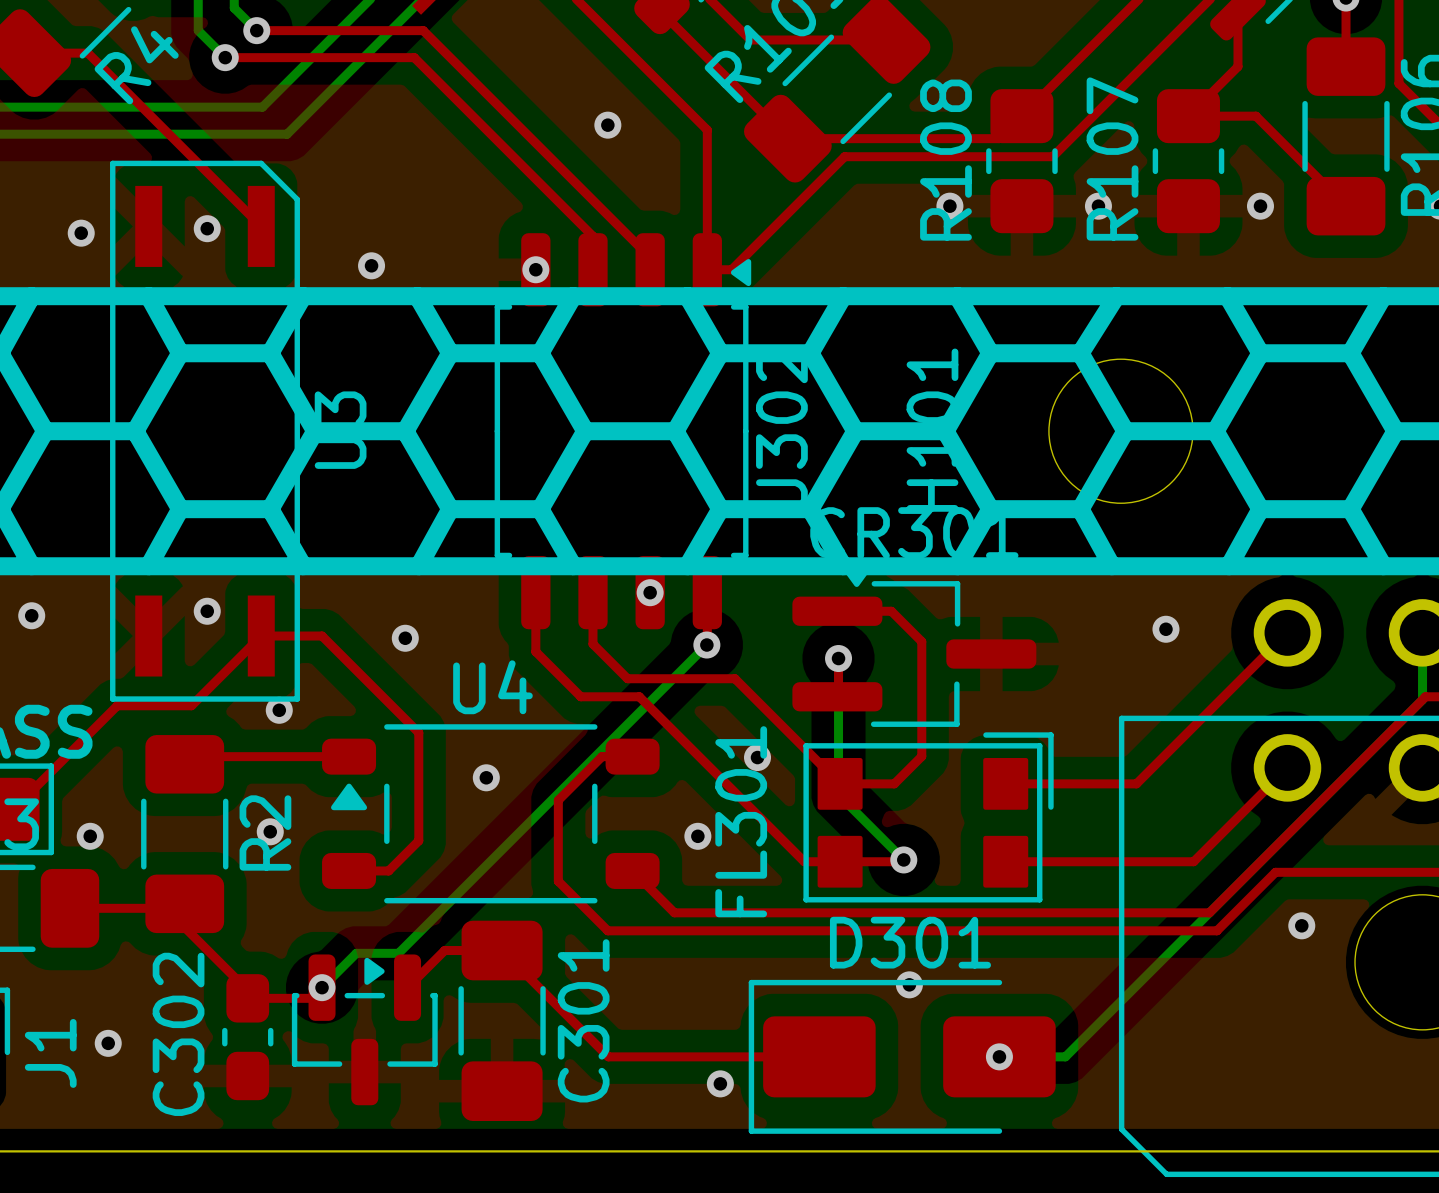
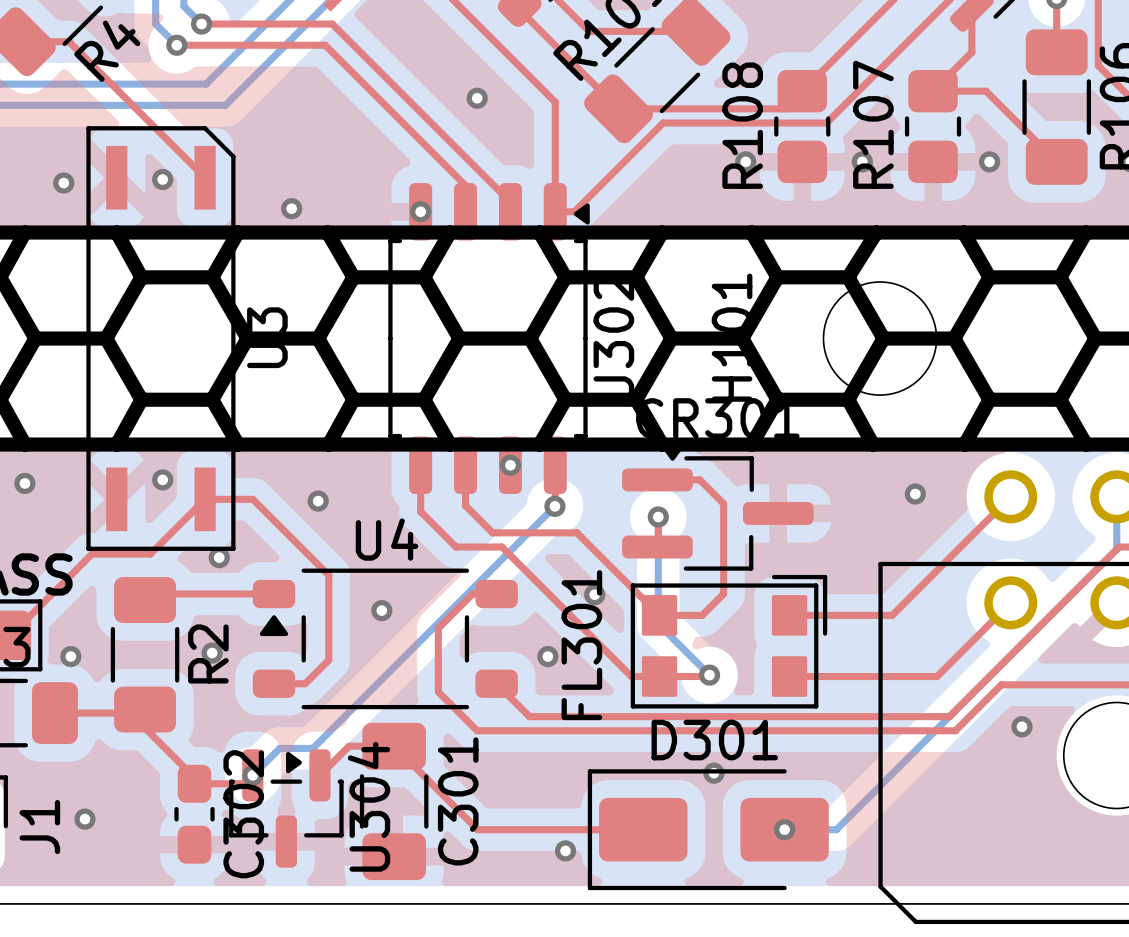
U304 name: none -> U304 (369, 806)
C302 name position: C302 (178, 1034) -> C302 (243, 814)

